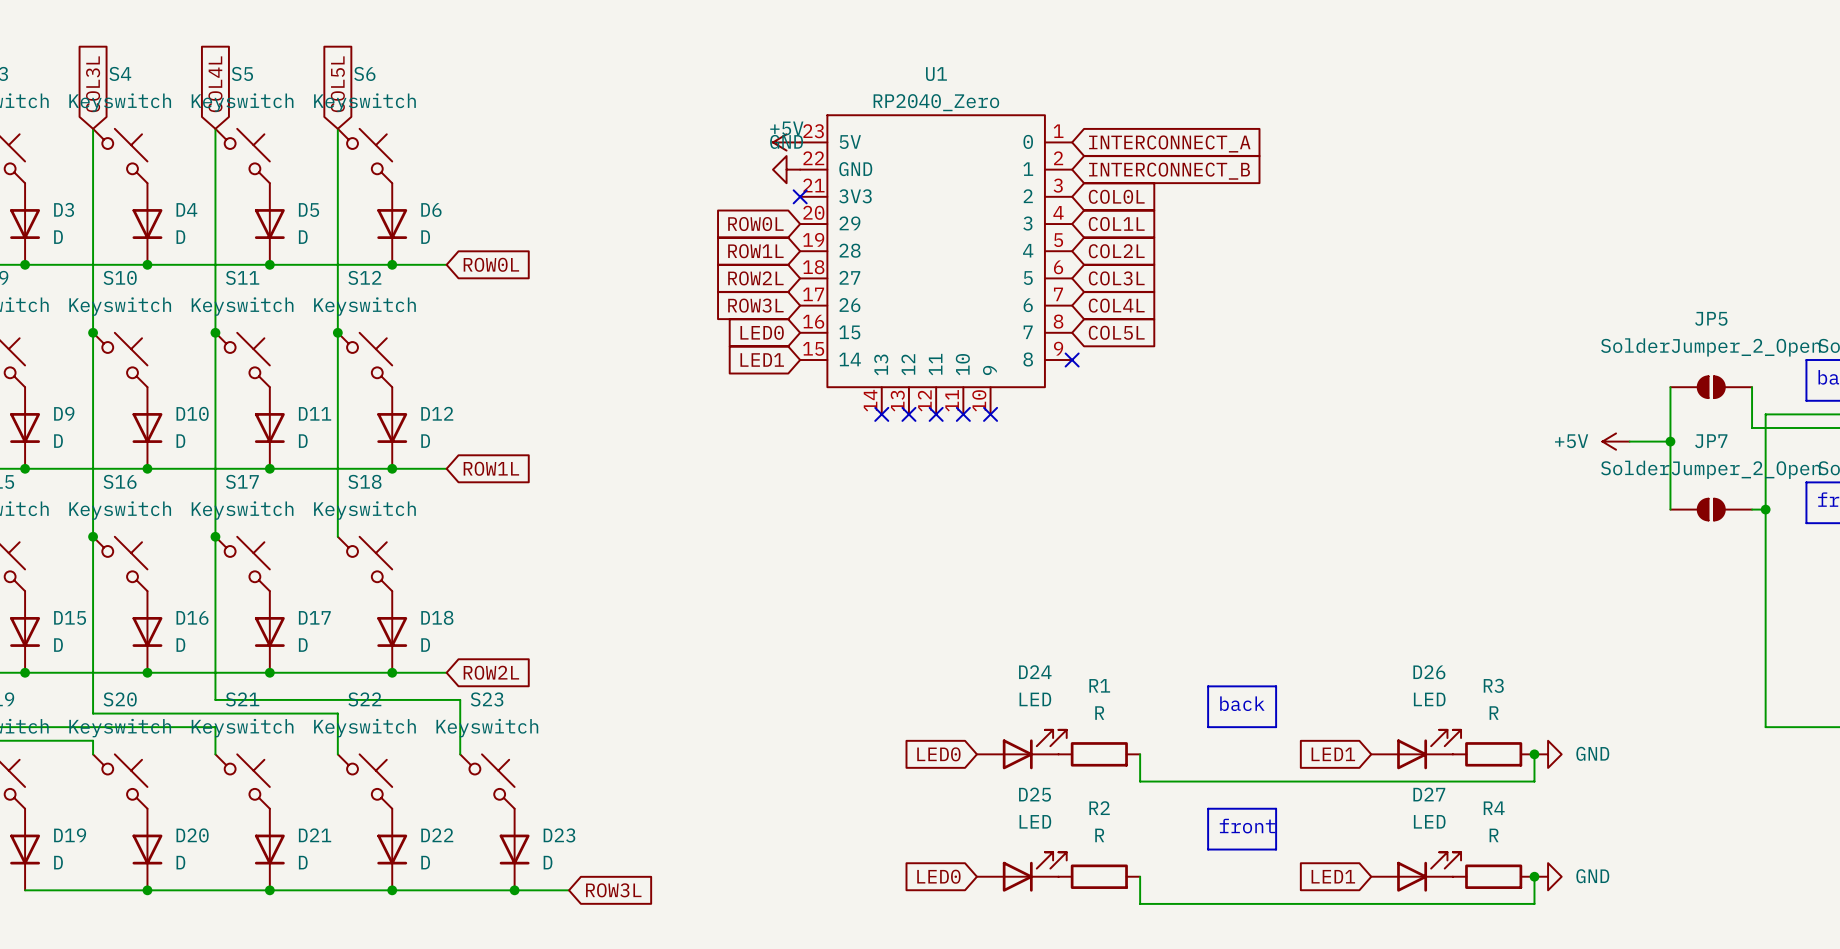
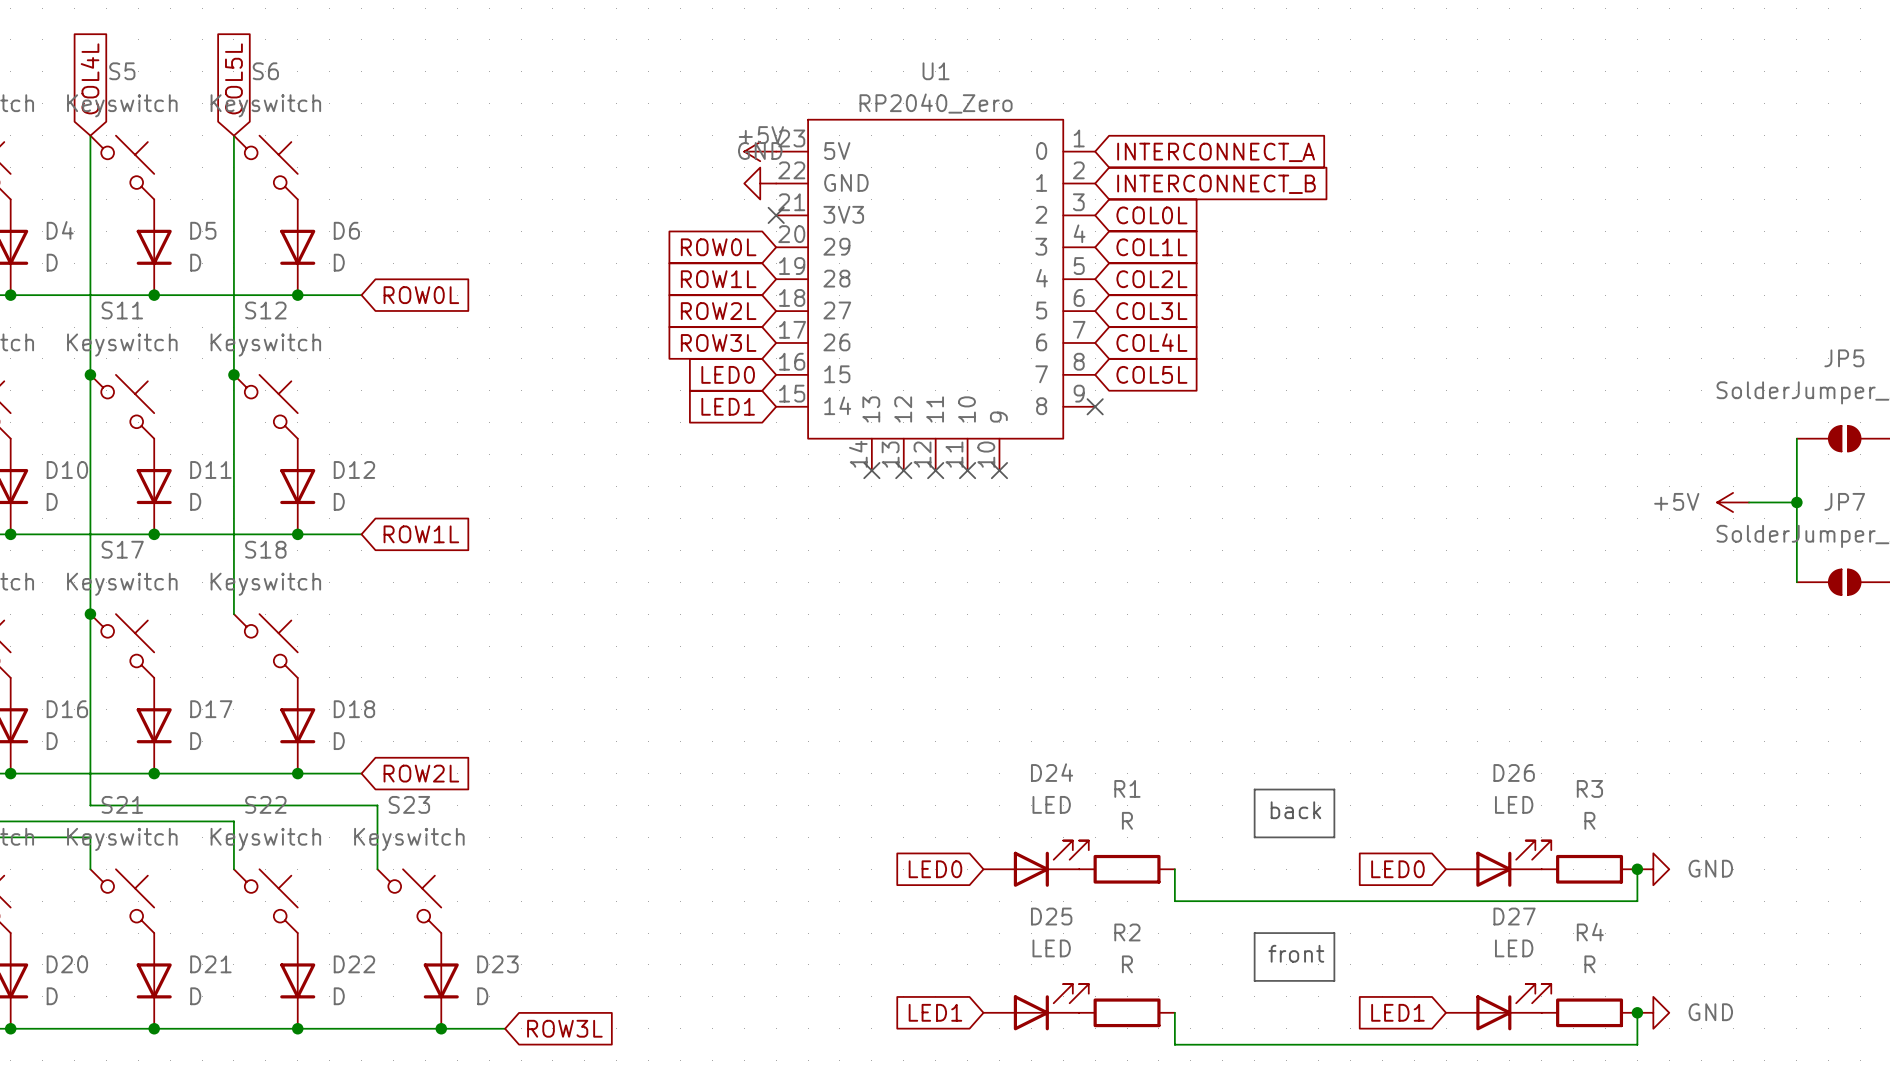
global label: LED1 (1333, 754) -> LED0 (1397, 869)
global label: LED0 (938, 876) -> LED1 (935, 1012)

